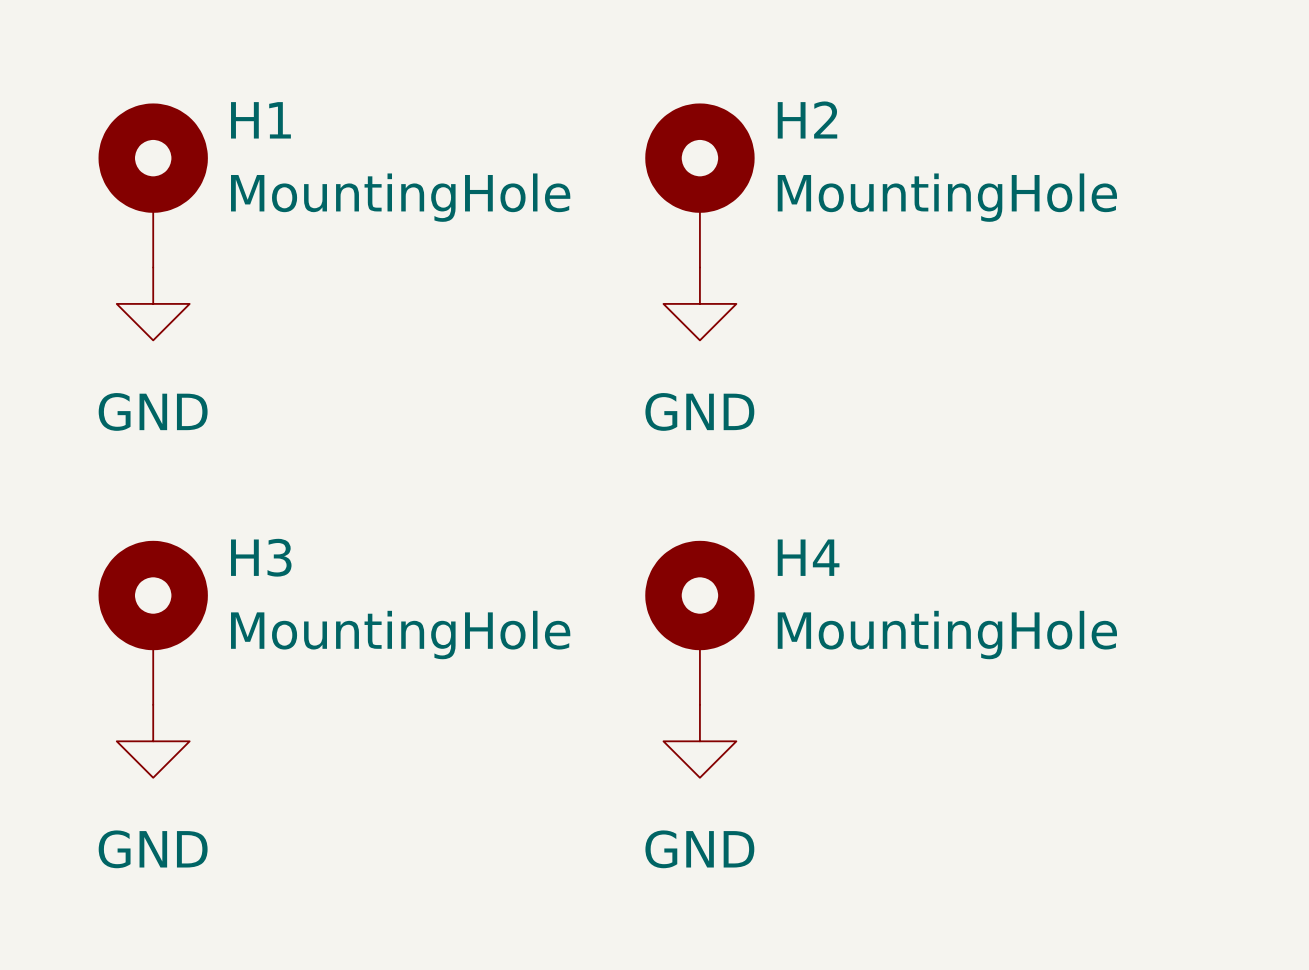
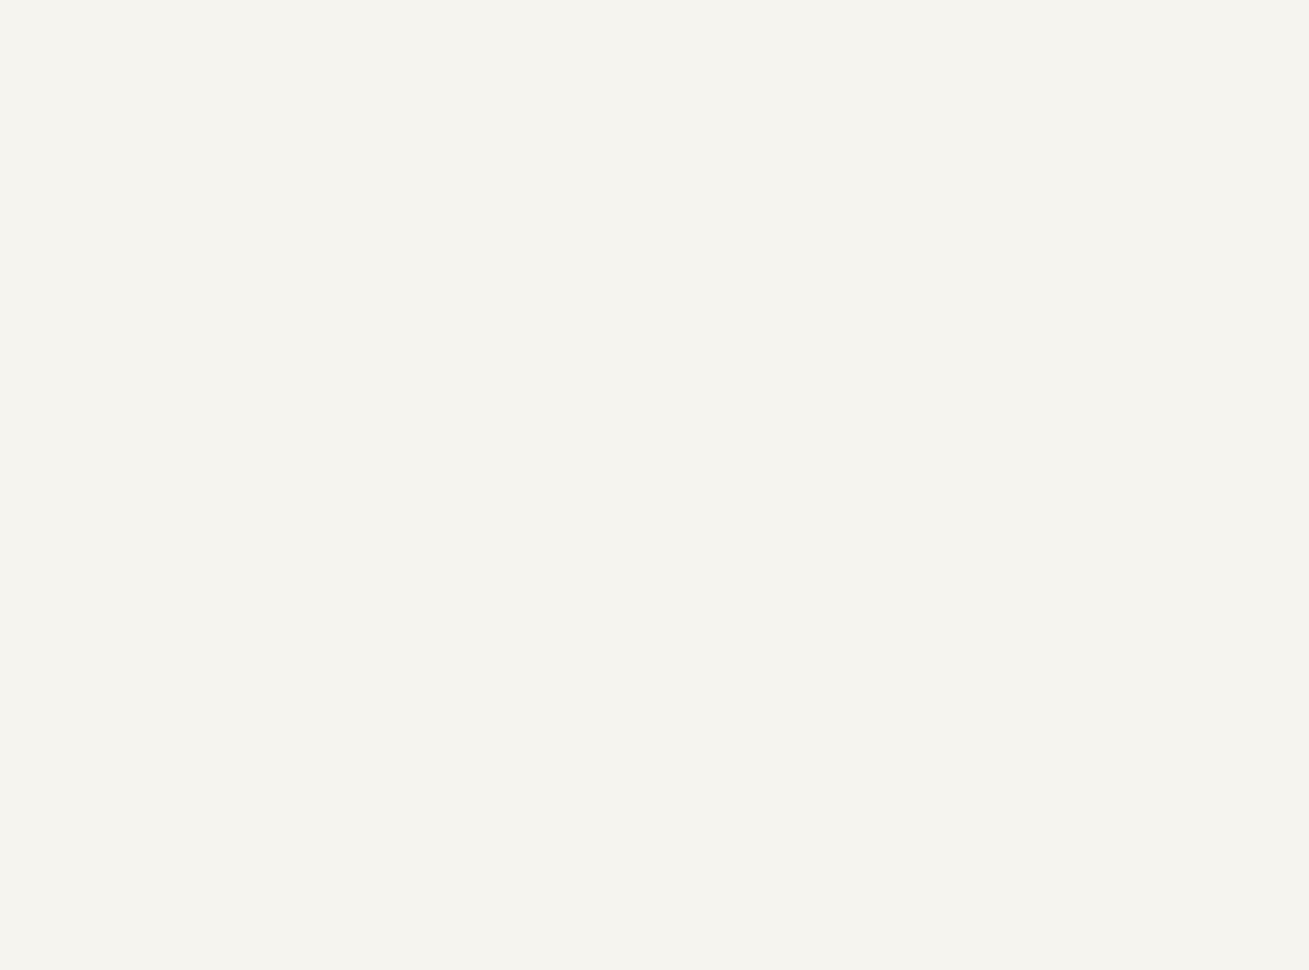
H1: MountingHole (153, 185) -> none
H2: MountingHole (699, 185) -> none
power symbol: GND (153, 303) -> none
power symbol: GND (699, 303) -> none
H3: MountingHole (153, 622) -> none
H4: MountingHole (699, 622) -> none
power symbol: GND (153, 741) -> none
power symbol: GND (699, 741) -> none

